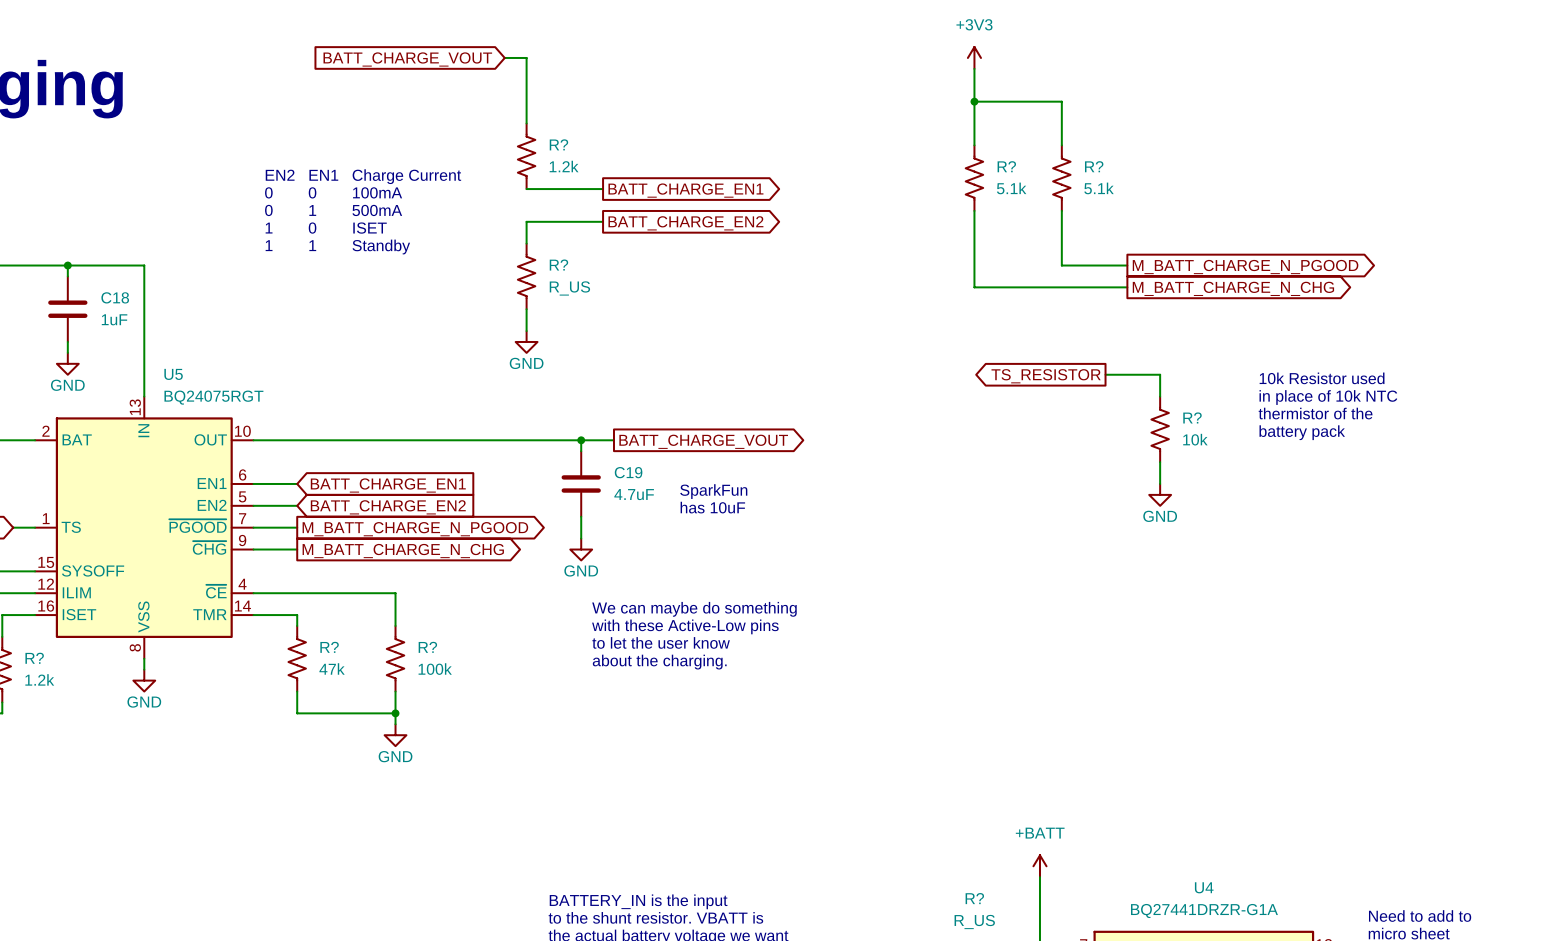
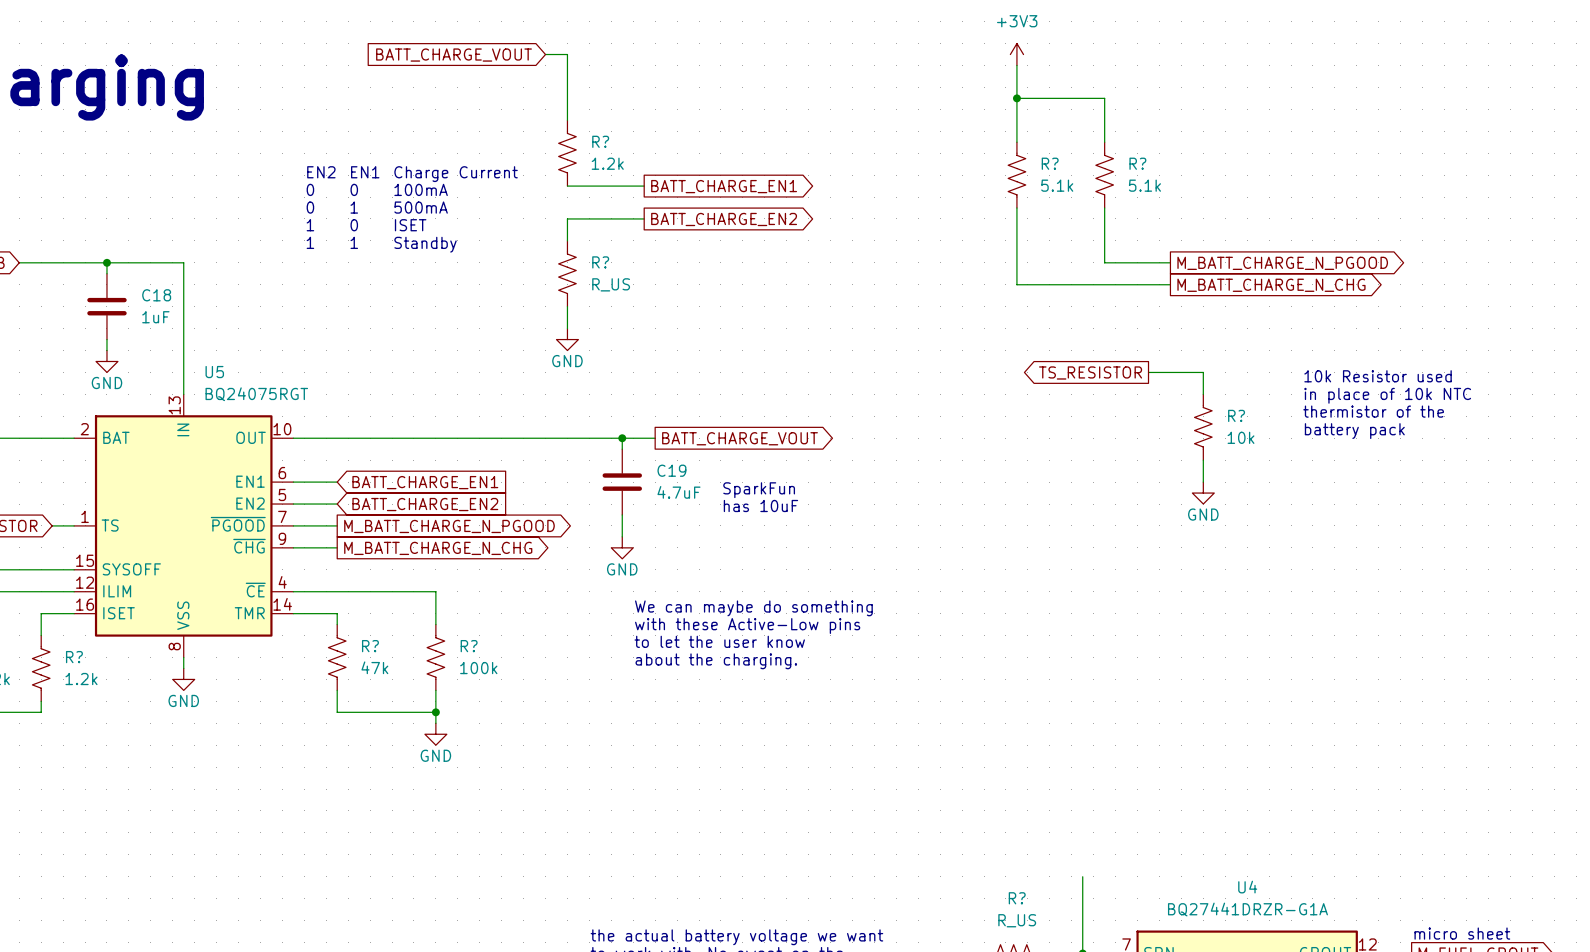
power symbol: +BATT (1039, 866) -> none
text: BATTERY_IN is the input (638, 901) -> none
text: Need to add to (1420, 916) -> none
text: to the shunt resistor. VBATT is (655, 917) -> none

